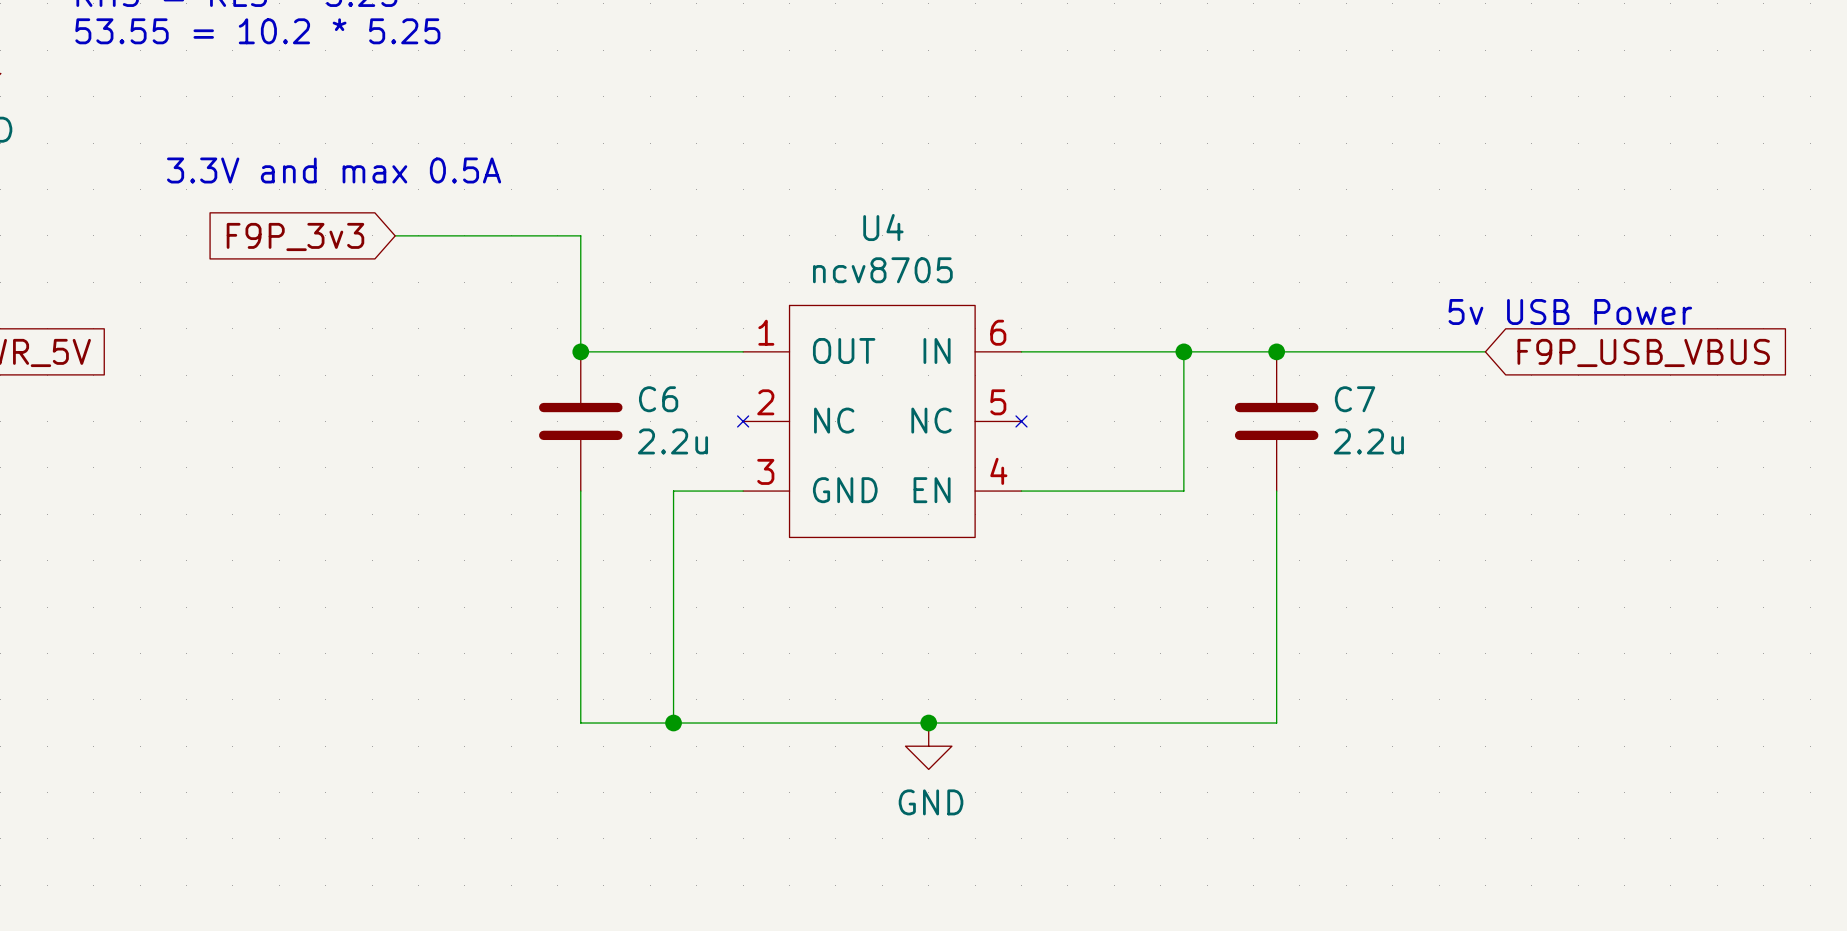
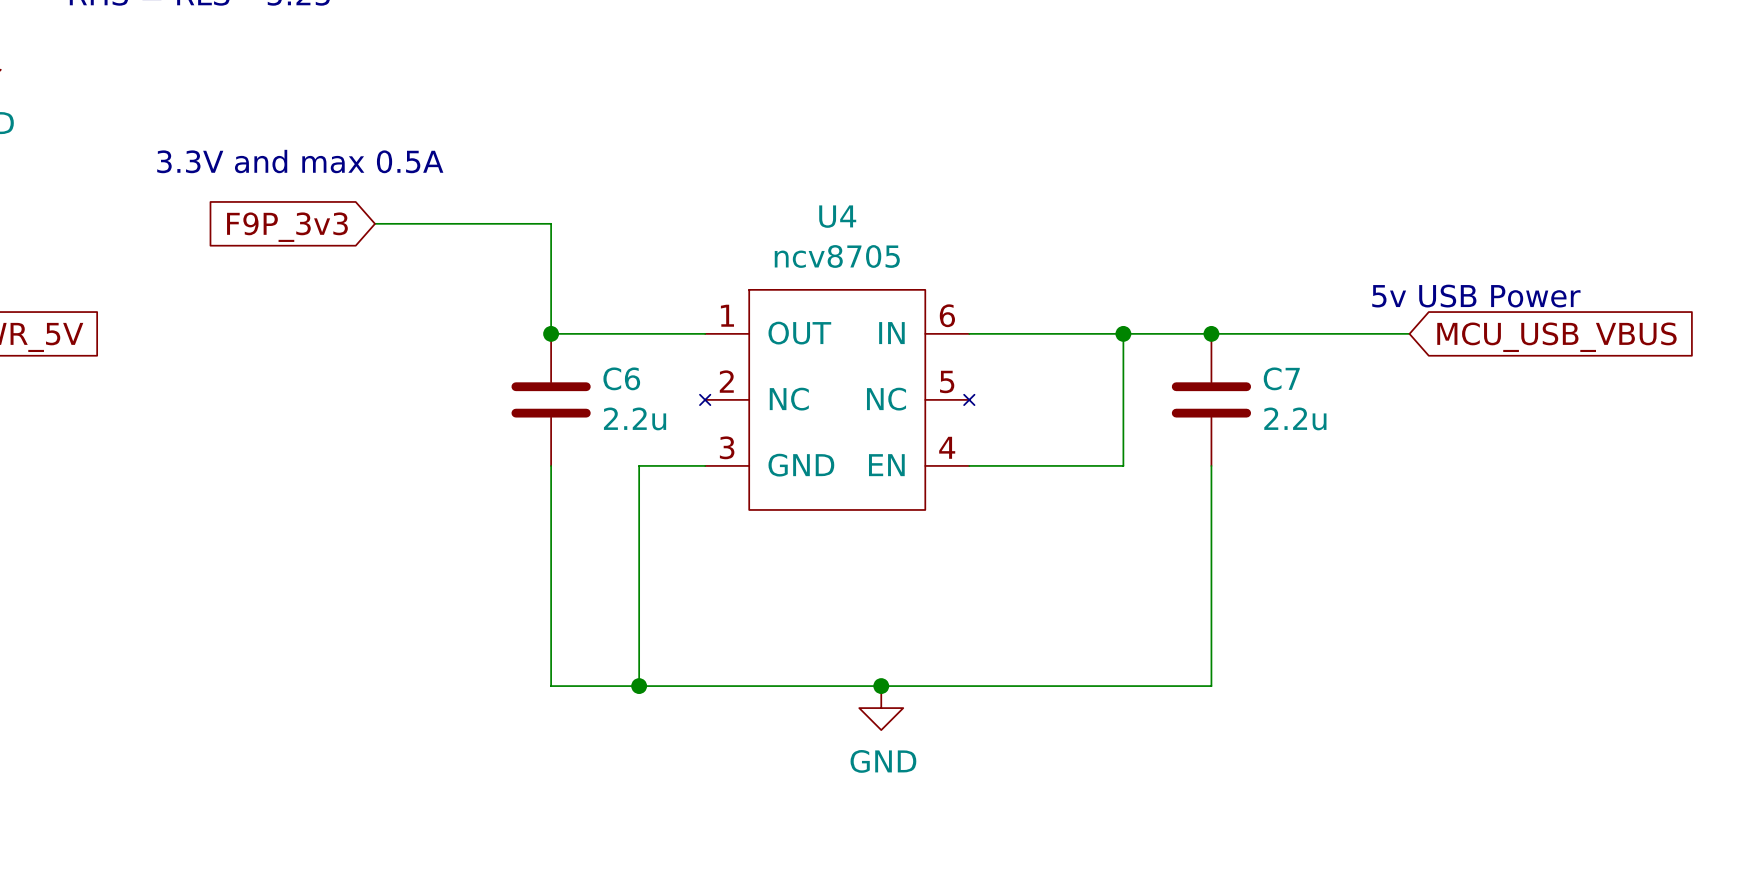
text: 53.55 = 10.2 * 5.25 (257, 31) -> none
global label: F9P_USB_VBUS (1643, 352) -> MCU_USB_VBUS (1556, 337)

